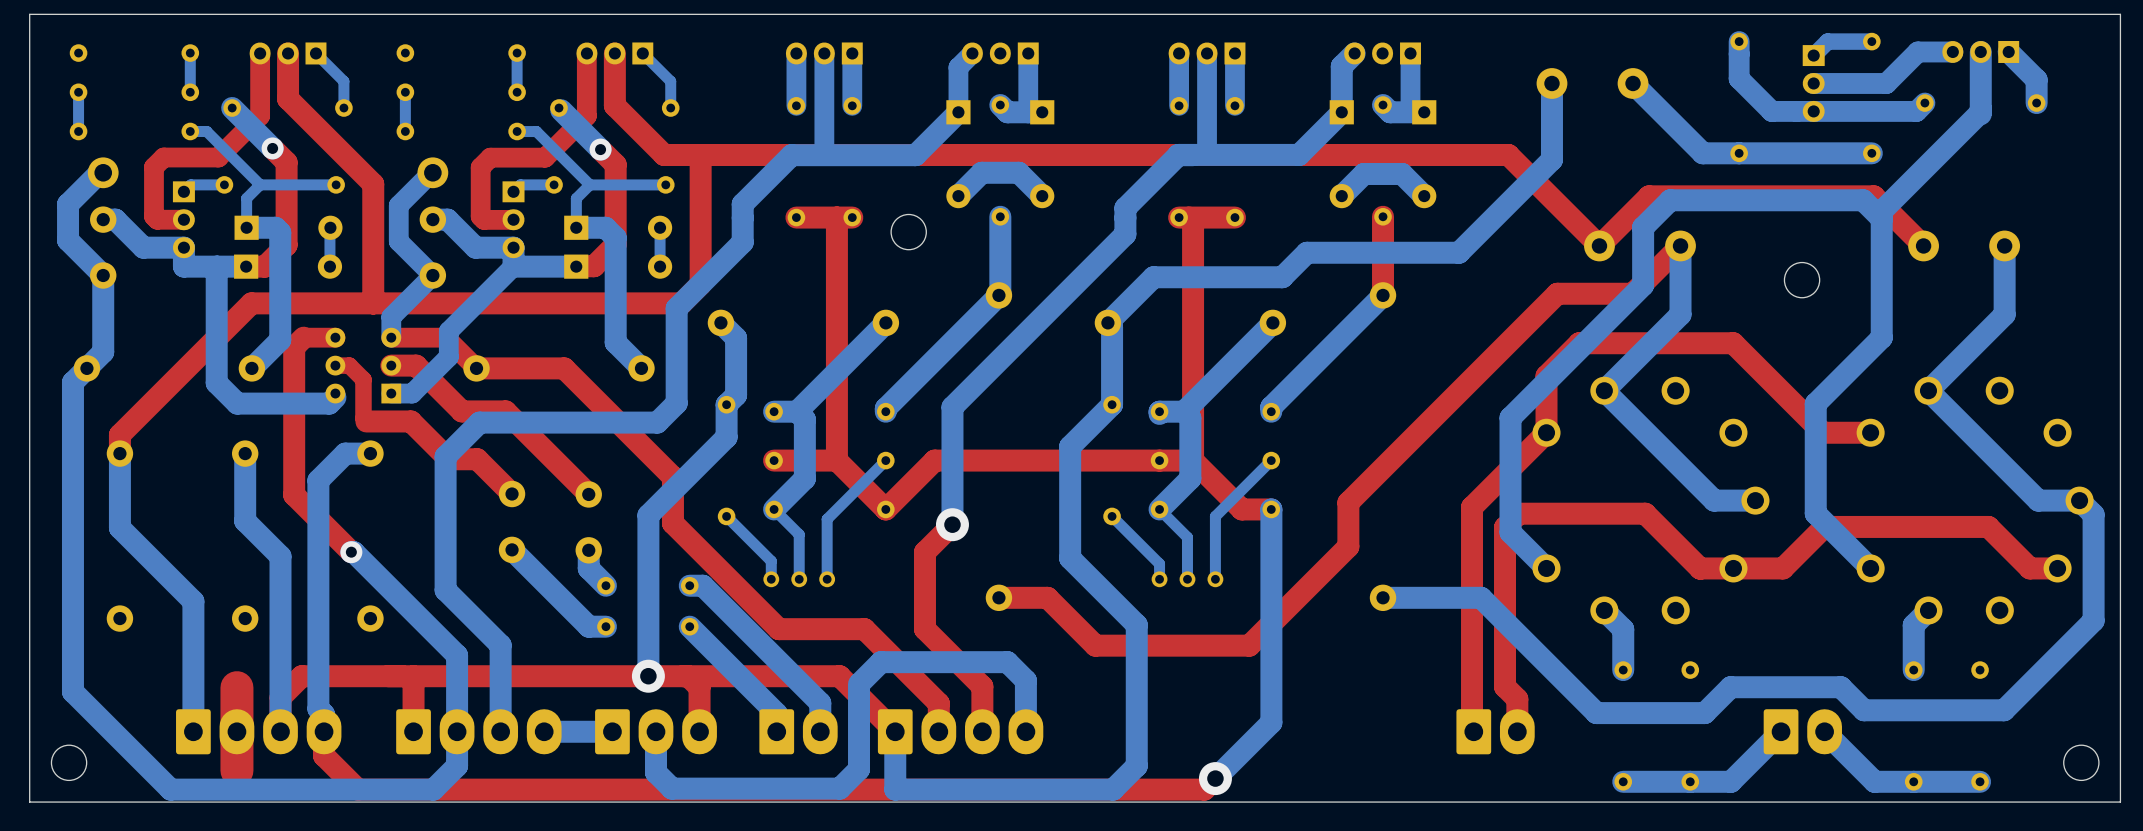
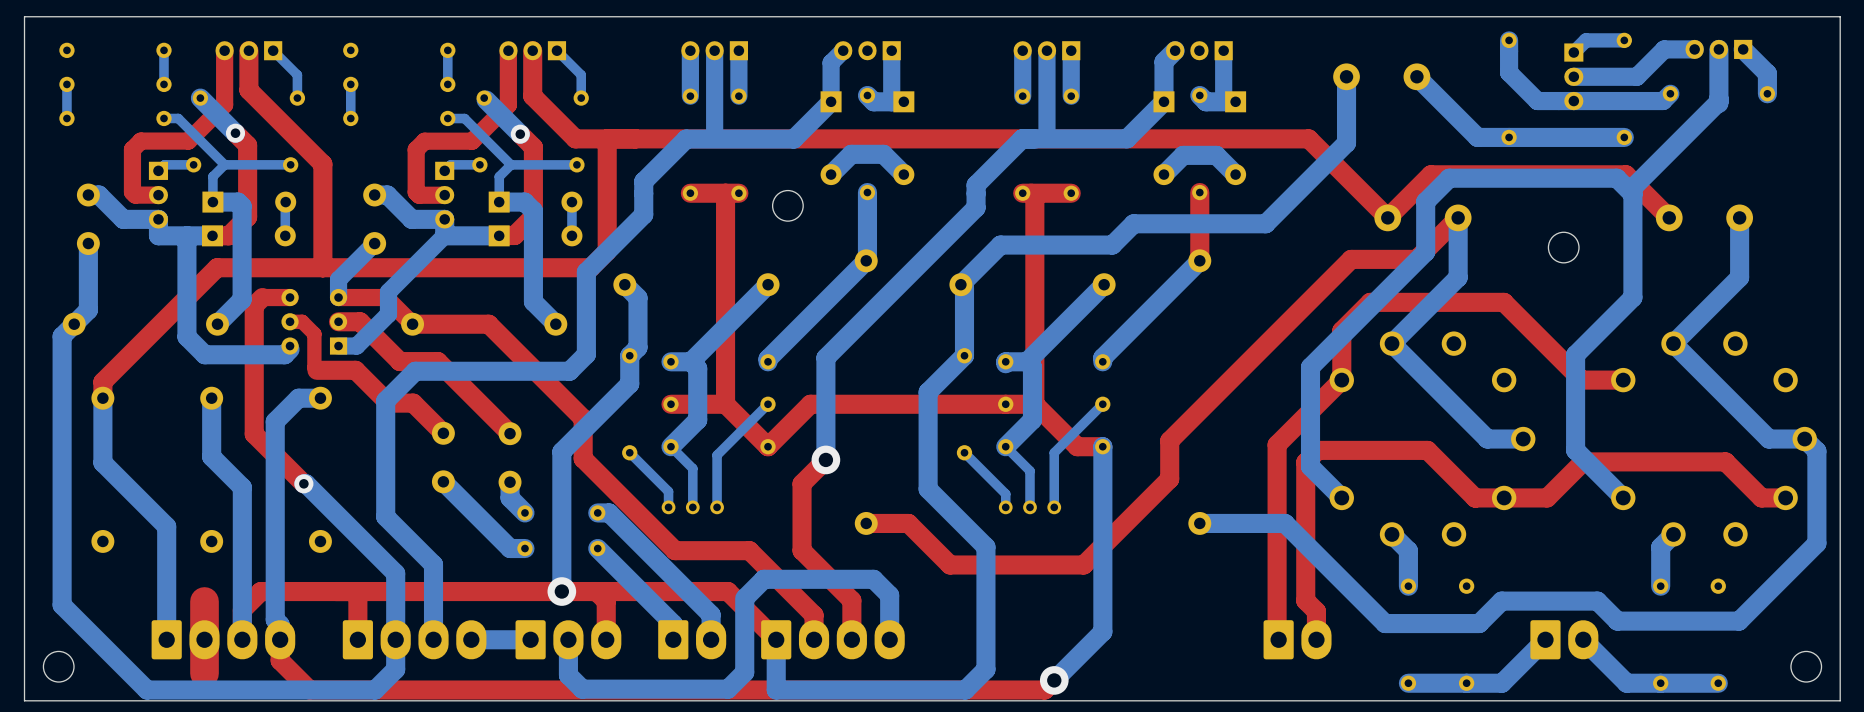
bottom track: (103, 172) (99, 172) (68, 204) (68, 240) (103, 275) -> none
part: (103, 172) -> none
bottom track: (432, 172) (398, 205) (398, 241) (432, 275) -> none
part: (432, 172) -> none

